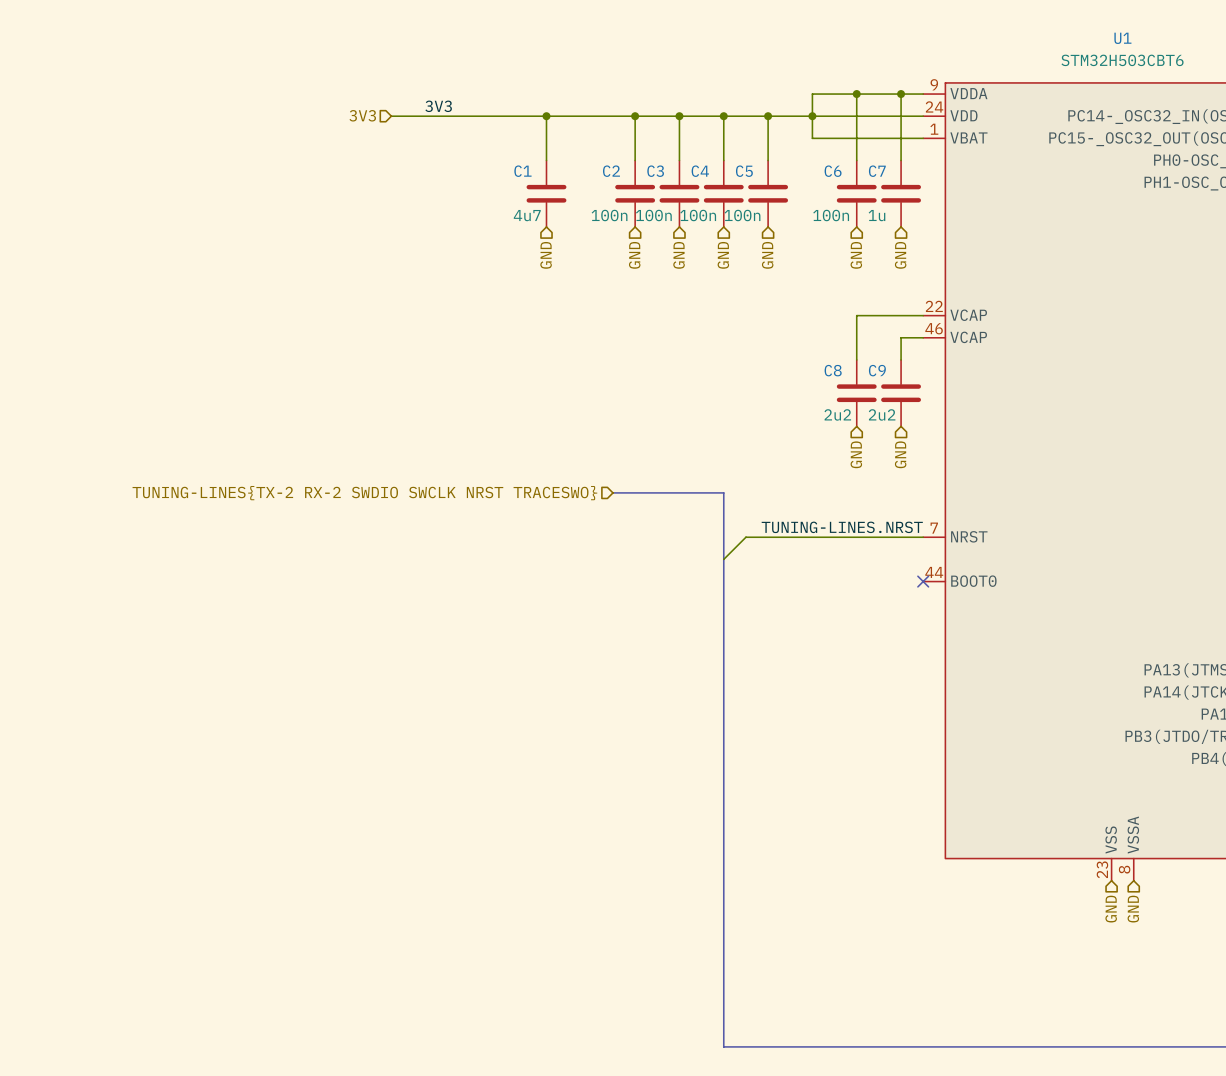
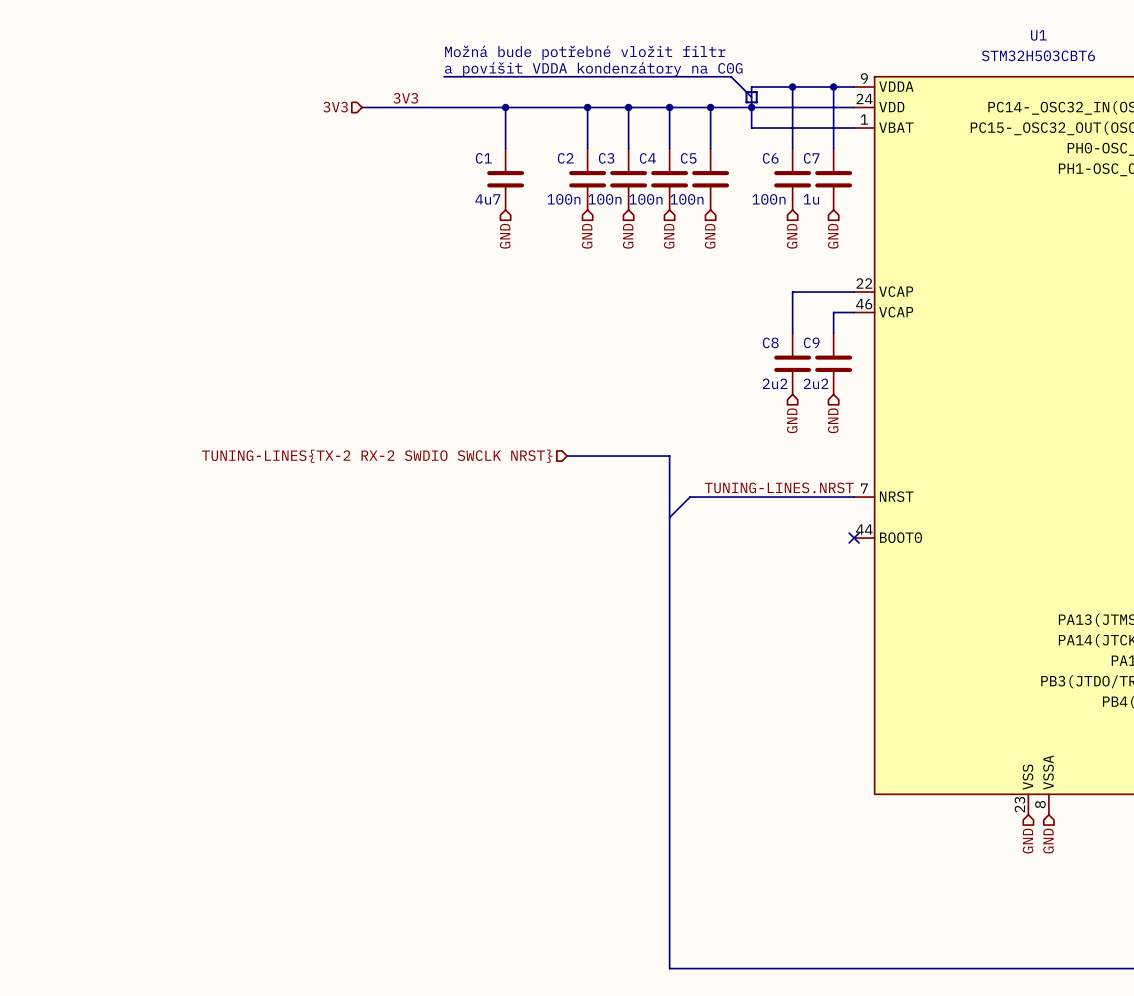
text: none -> Možná bude potřebné vložit filtr (585, 52)
text: none -> a povíšit VDDA kondenzátory na C0G (593, 69)
line: none -> (444, 76) (731, 76) (751, 97)
line: none -> (746, 92) (756, 92) (756, 102) (746, 102) (746, 92)
hierarchical label: TUNING-LINES{TX-2 RX-2 SWDIO SWCLK NRST TRACESWO} (364, 493) -> TUNING-LINES{TX-2 RX-2 SWDIO SWCLK NRST} (377, 456)

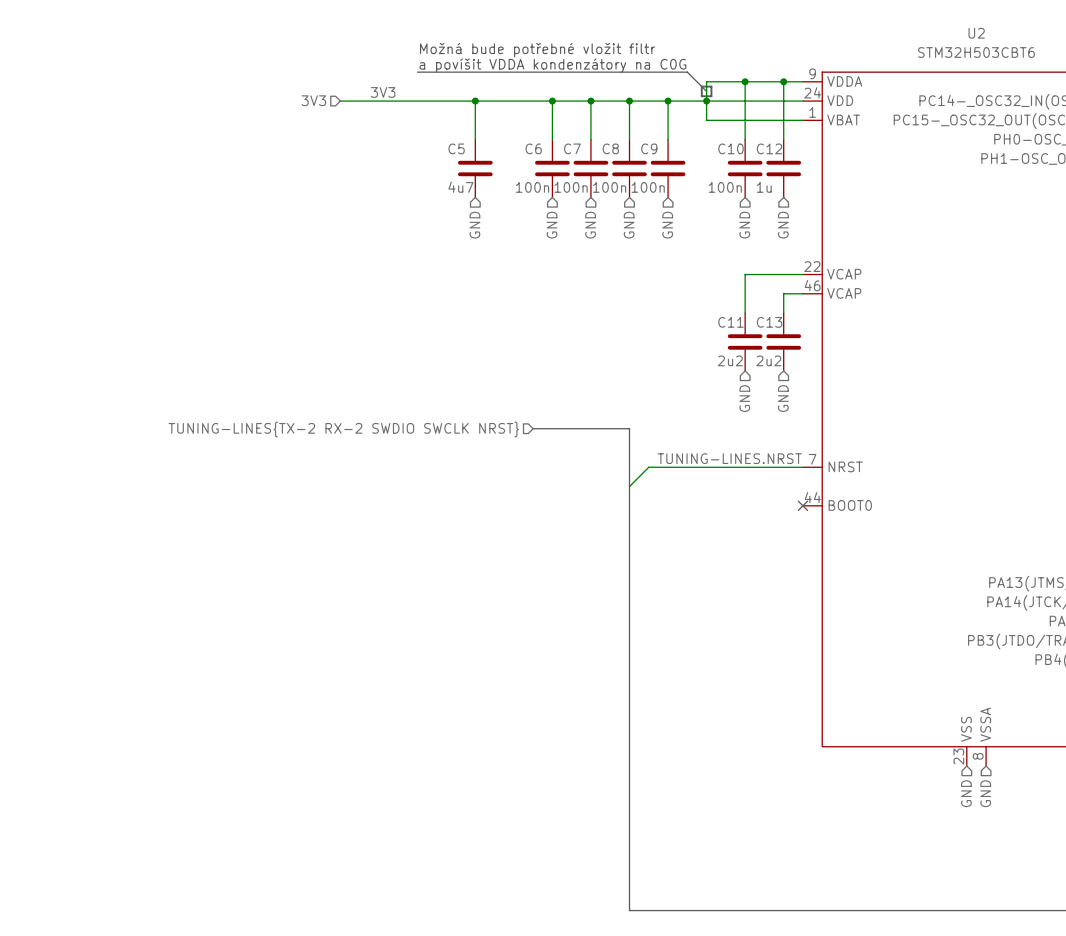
U1 name: U1 (1038, 35) -> U2 (976, 33)
C1 name: C1 (483, 158) -> C5 (456, 148)
C2 name: C2 (565, 158) -> C6 (533, 148)
C3 name: C3 (606, 158) -> C7 (572, 148)
C4 name: C4 (647, 158) -> C8 (610, 148)
C5 name: C5 (688, 158) -> C9 (649, 148)
C6 name: C6 (770, 158) -> C10 (730, 148)
C7 name: C7 (811, 158) -> C12 (769, 148)
C8 name: C8 (770, 342) -> C11 (730, 322)
C9 name: C9 (811, 342) -> C13 (769, 322)

